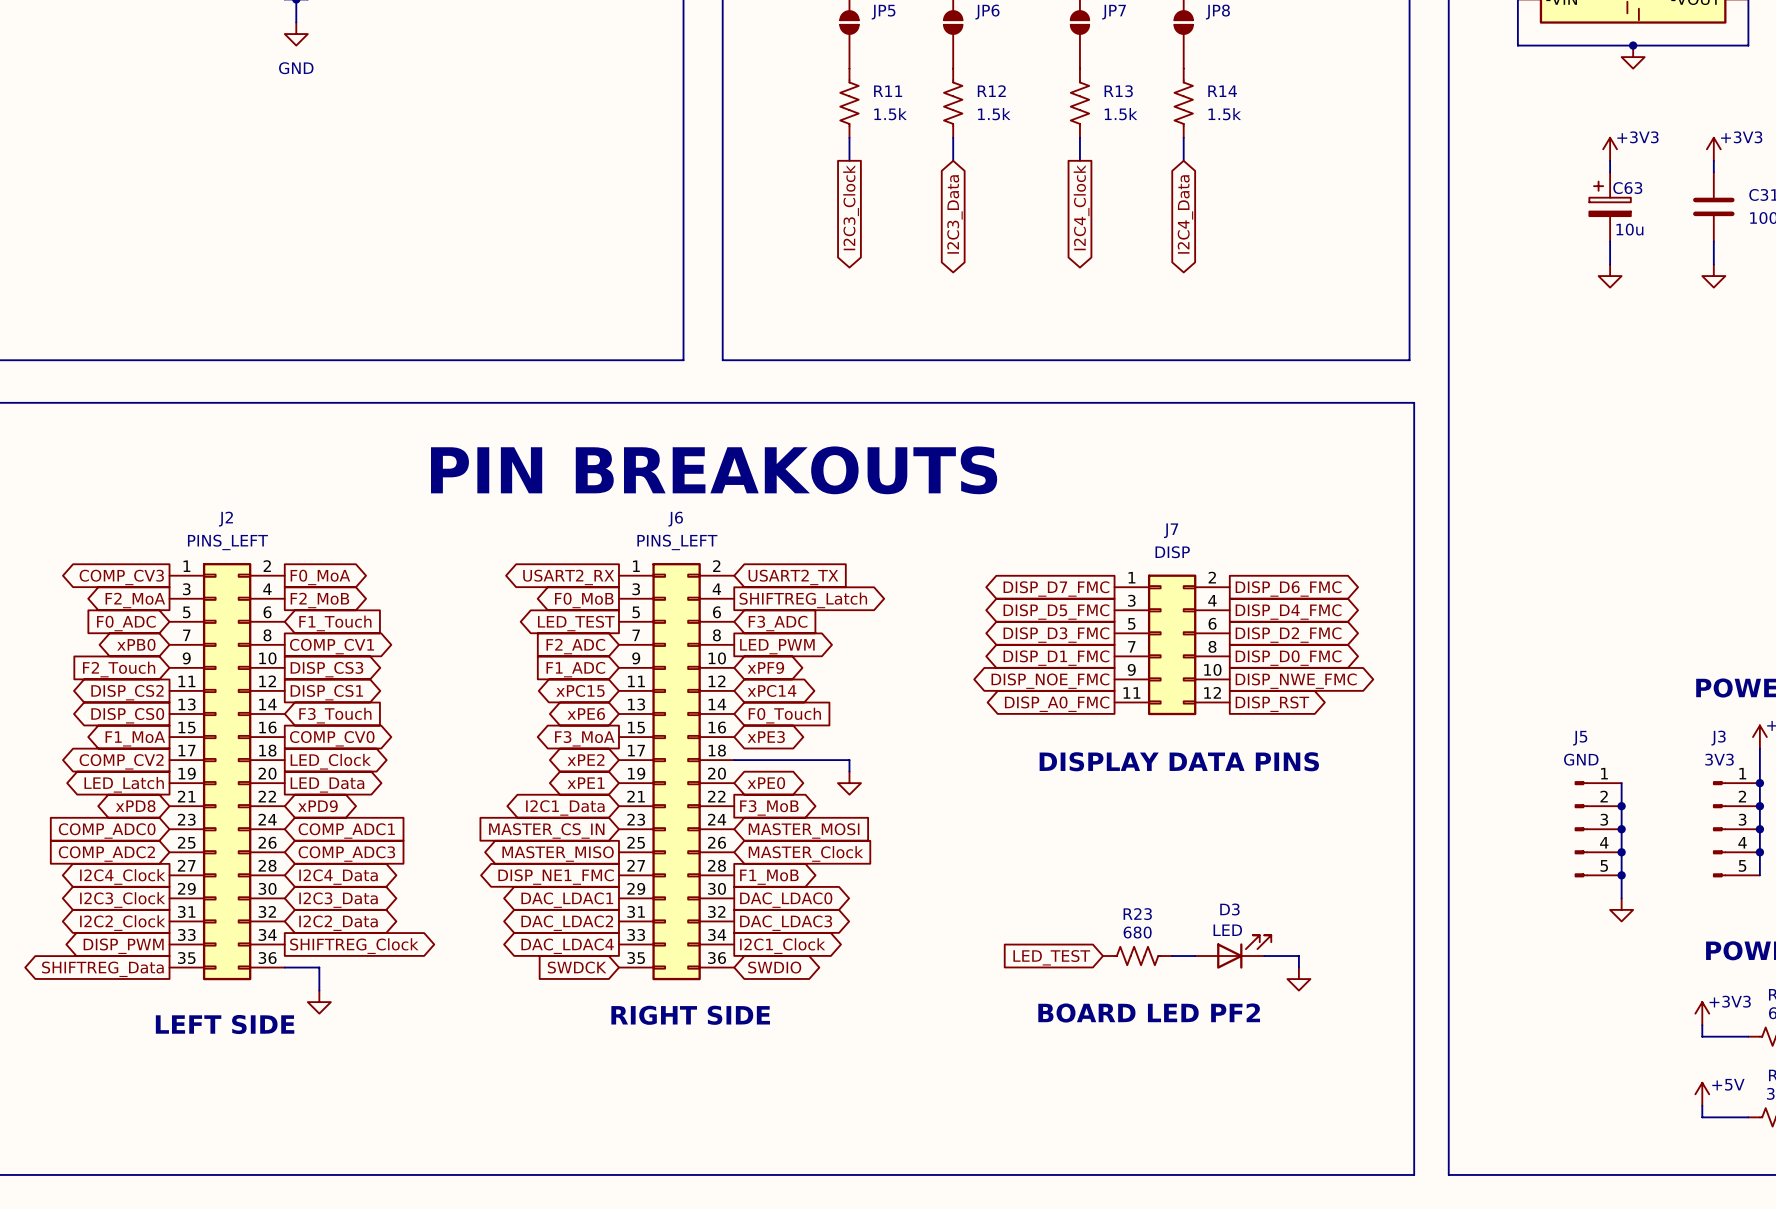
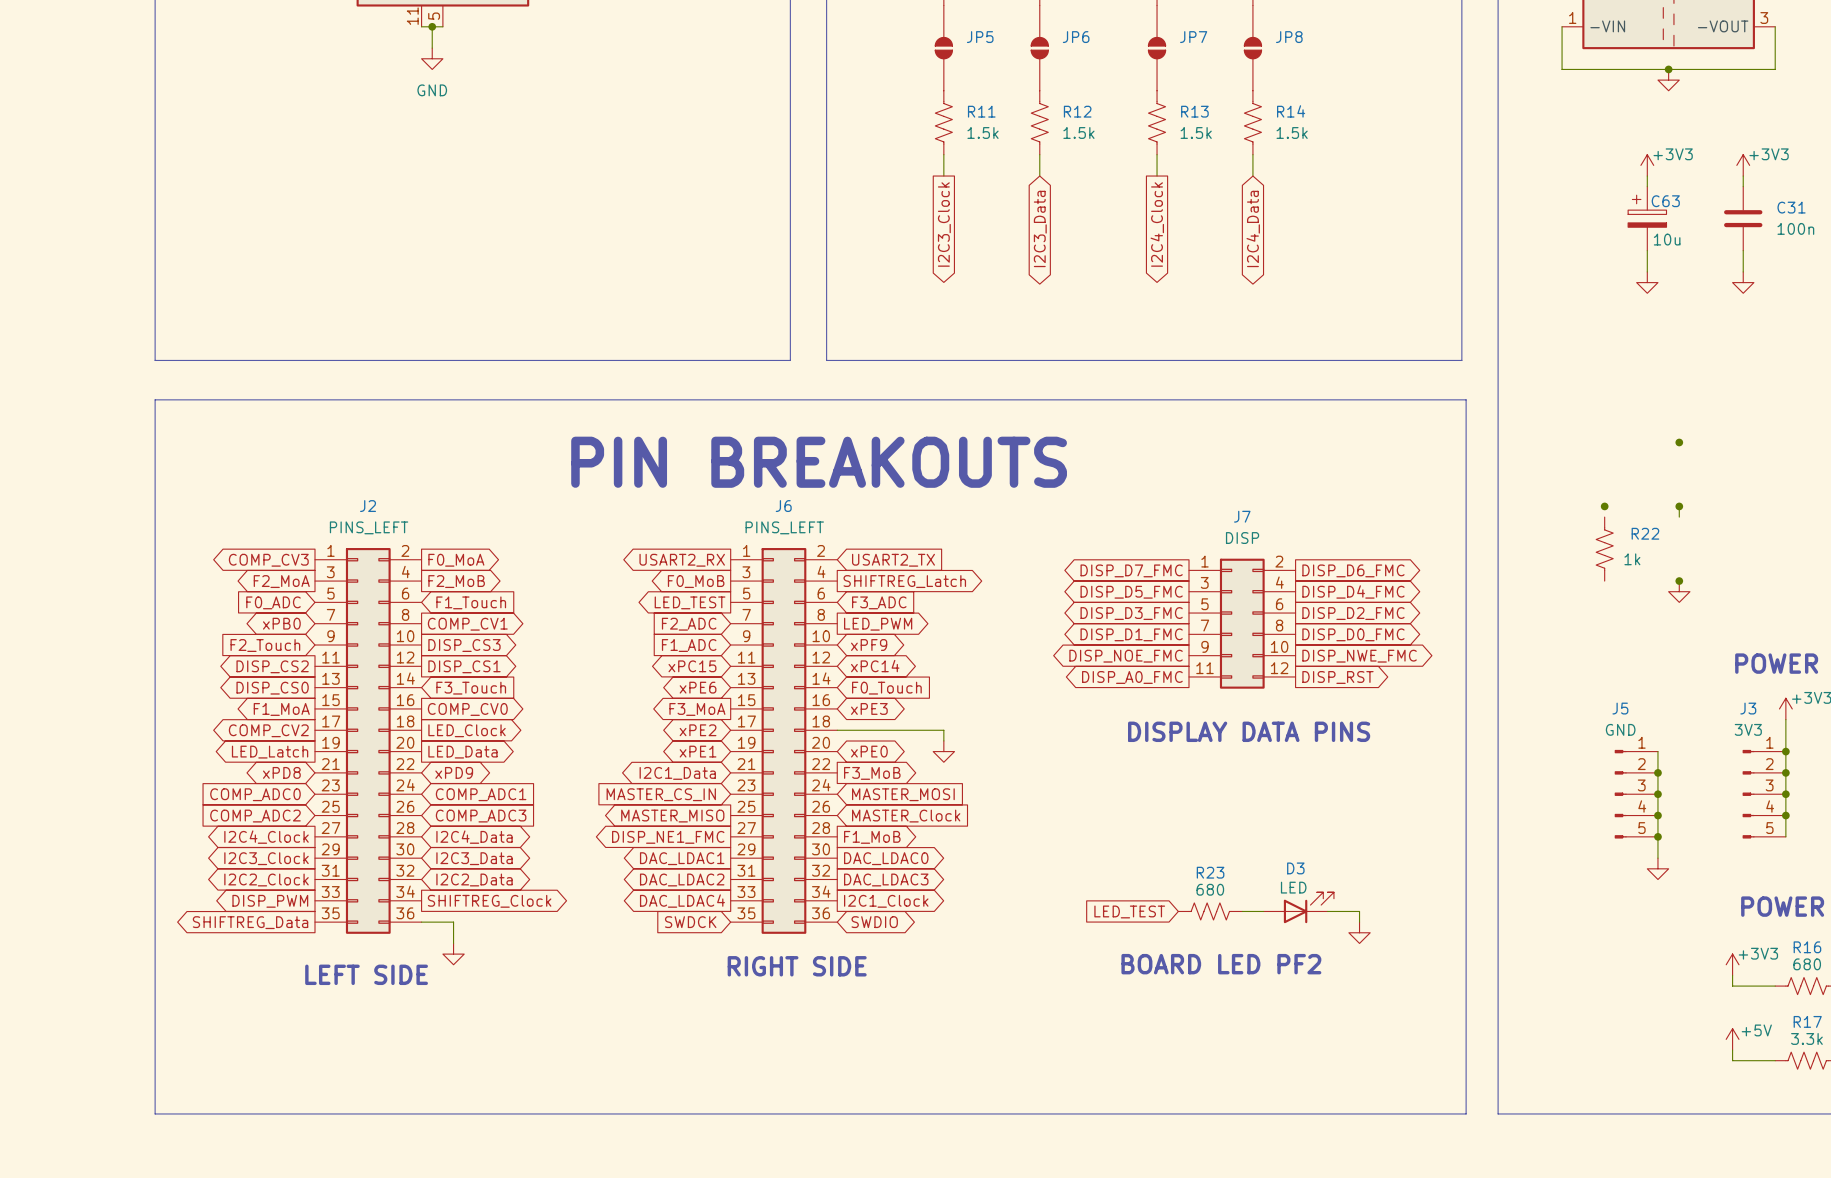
junction: none -> (1679, 442)
junction: none -> (1604, 506)
wire: none -> (1679, 506) (1679, 517)
junction: none -> (1679, 506)
R22: none -> 1k (1604, 549)
junction: none -> (1679, 581)
power symbol: none -> (1679, 591)

